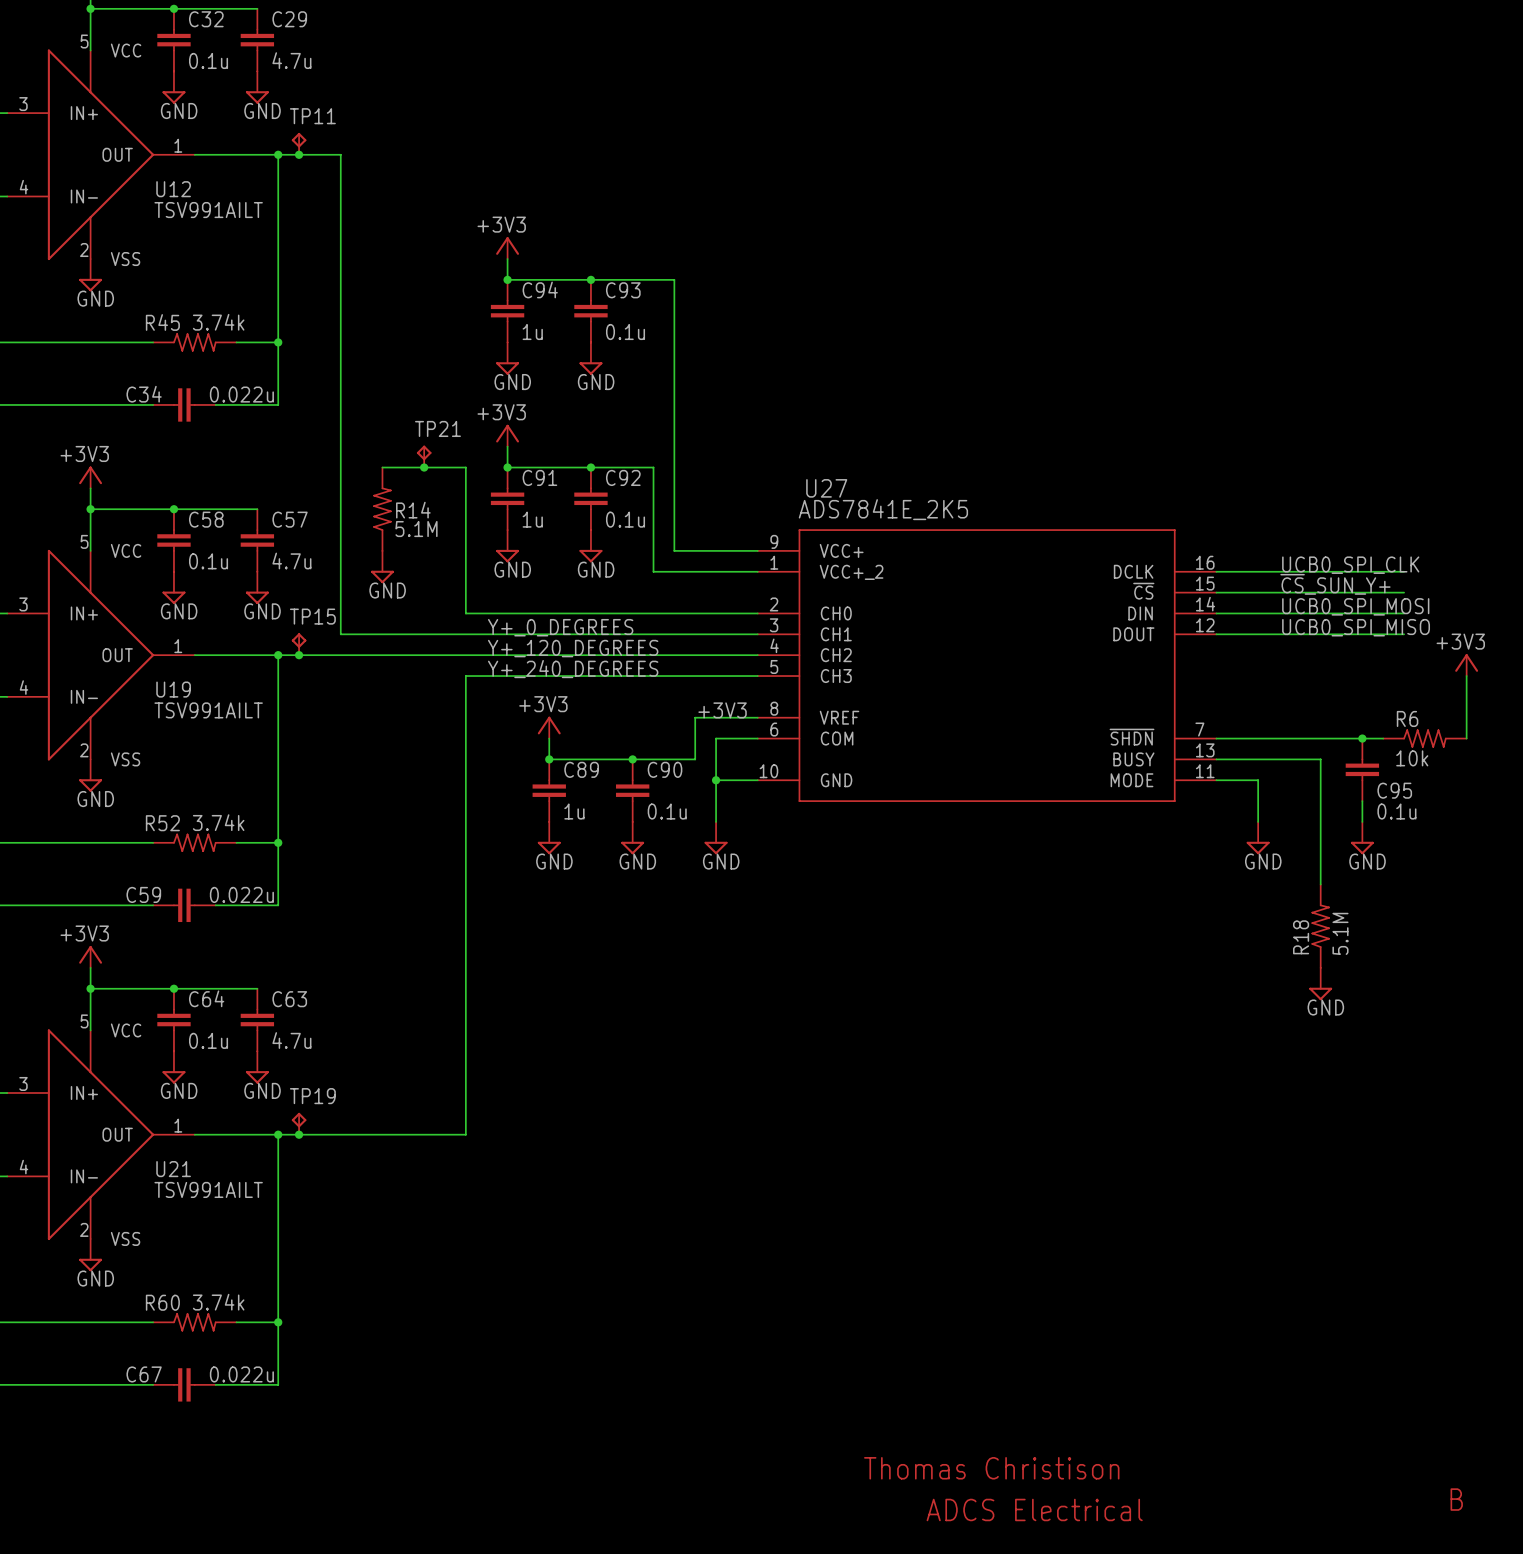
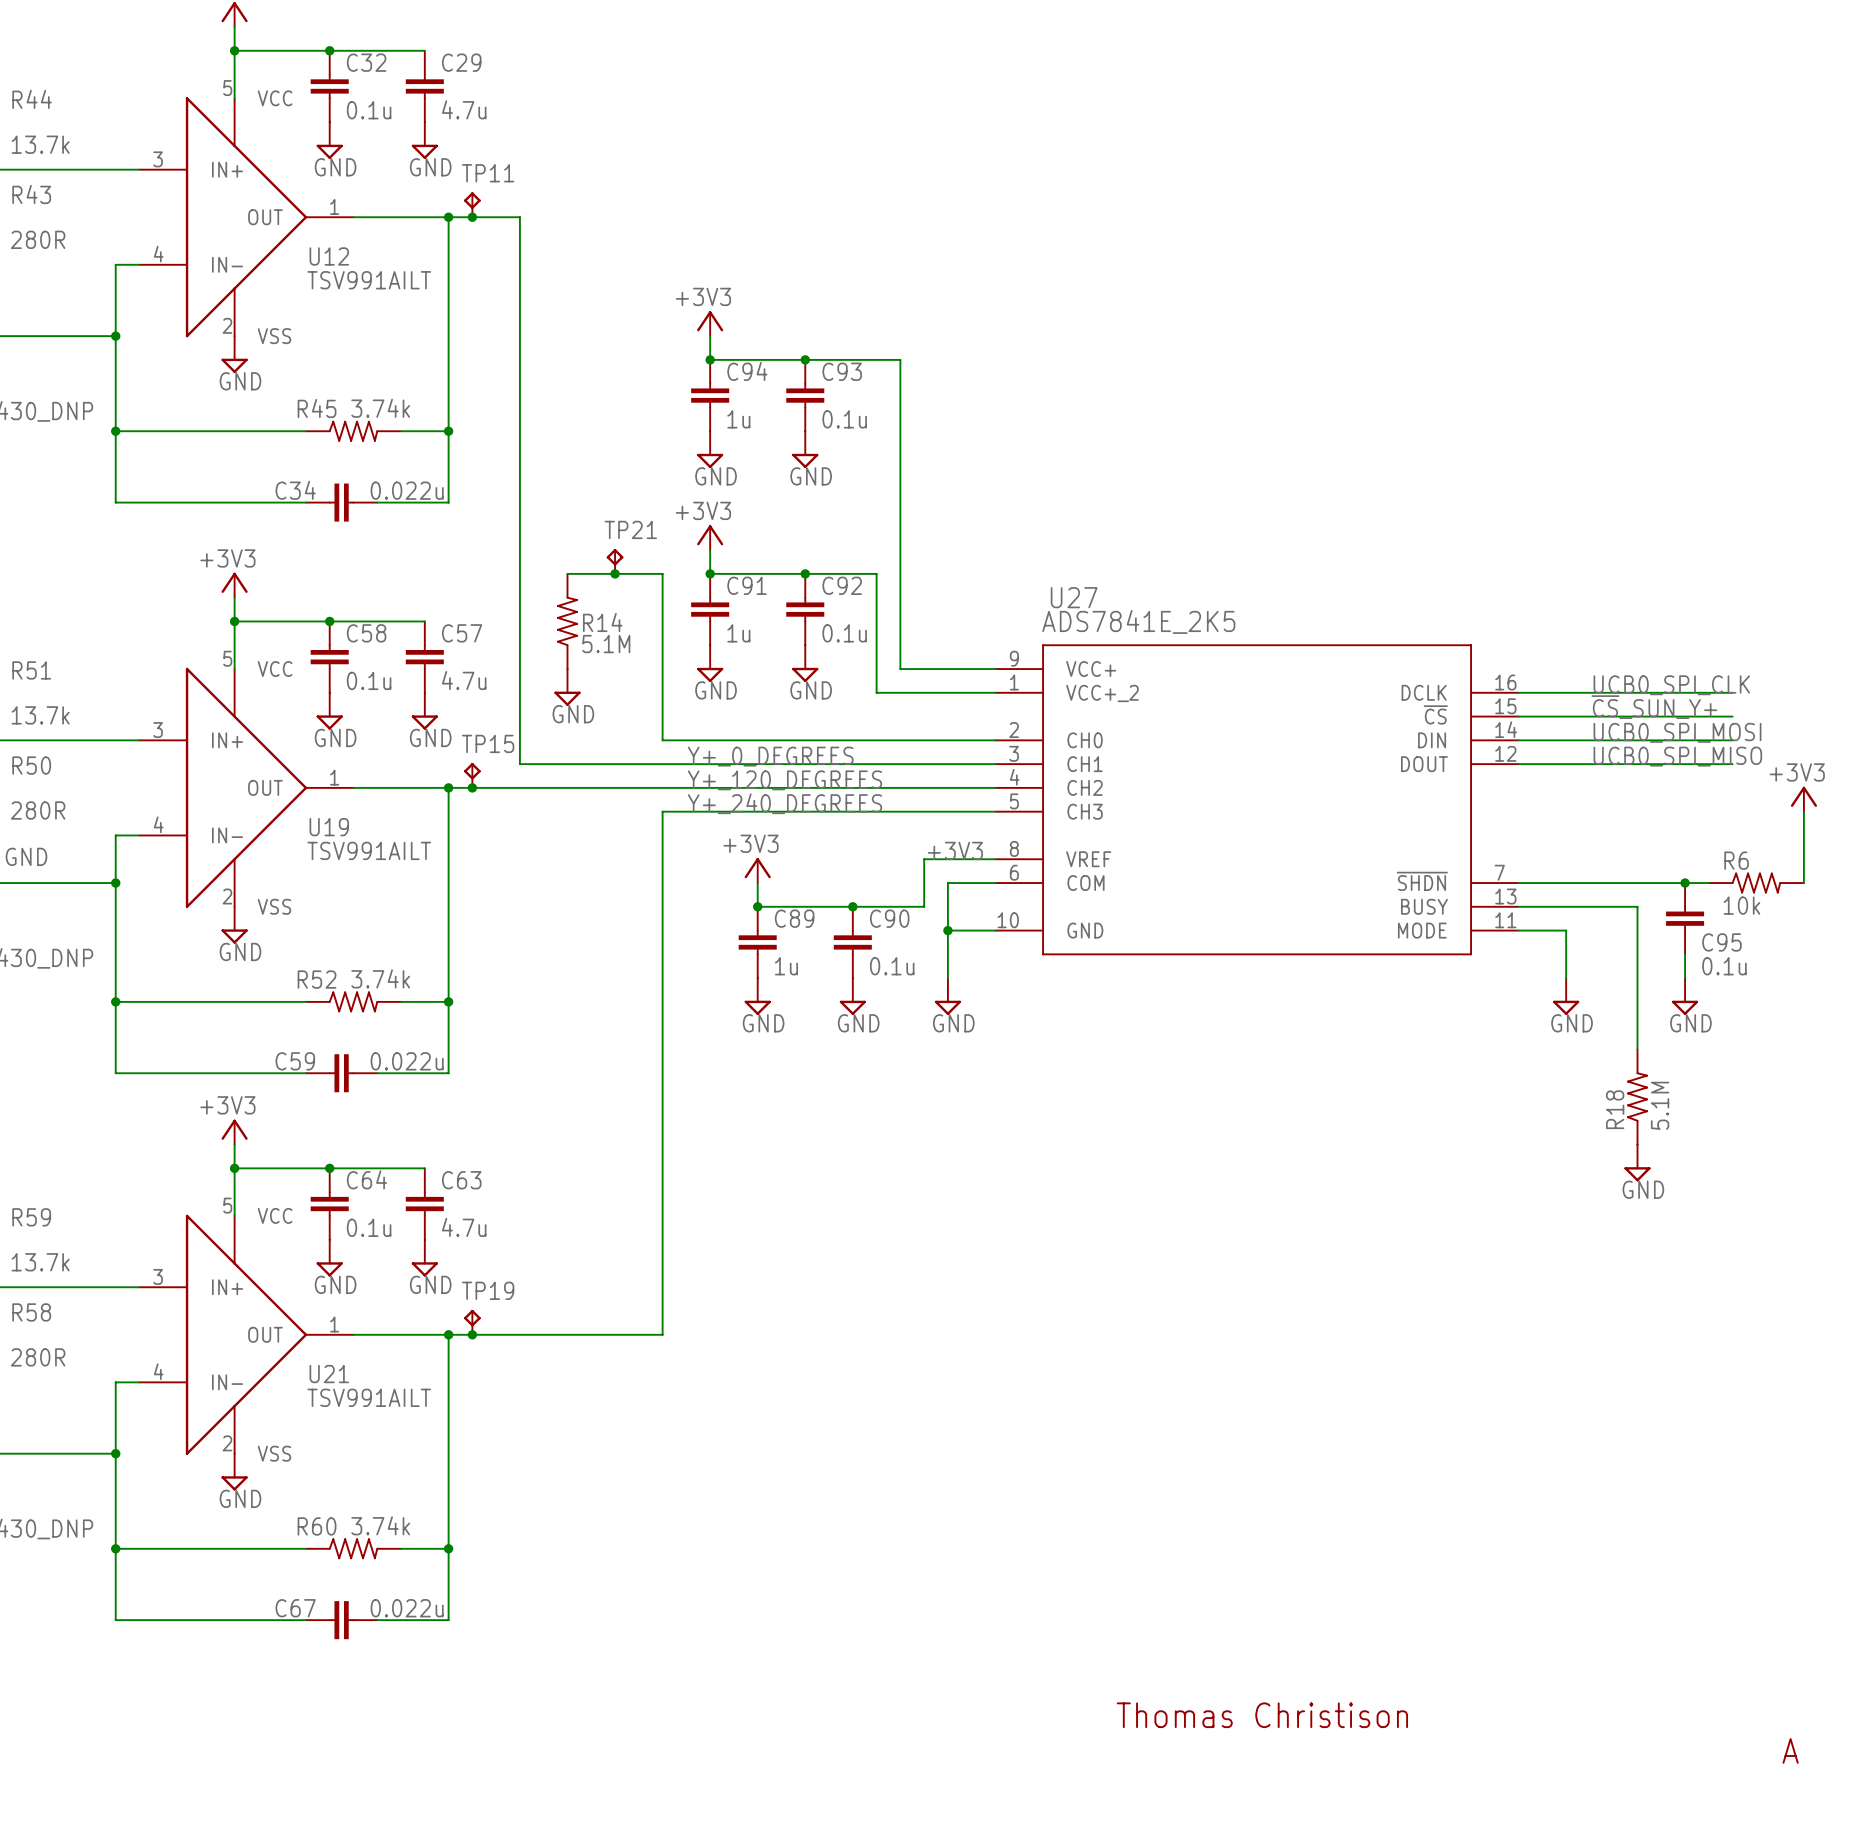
text: B (1456, 1499) -> A (1790, 1750)
text: ADCS Electrical (1034, 1509) -> none

